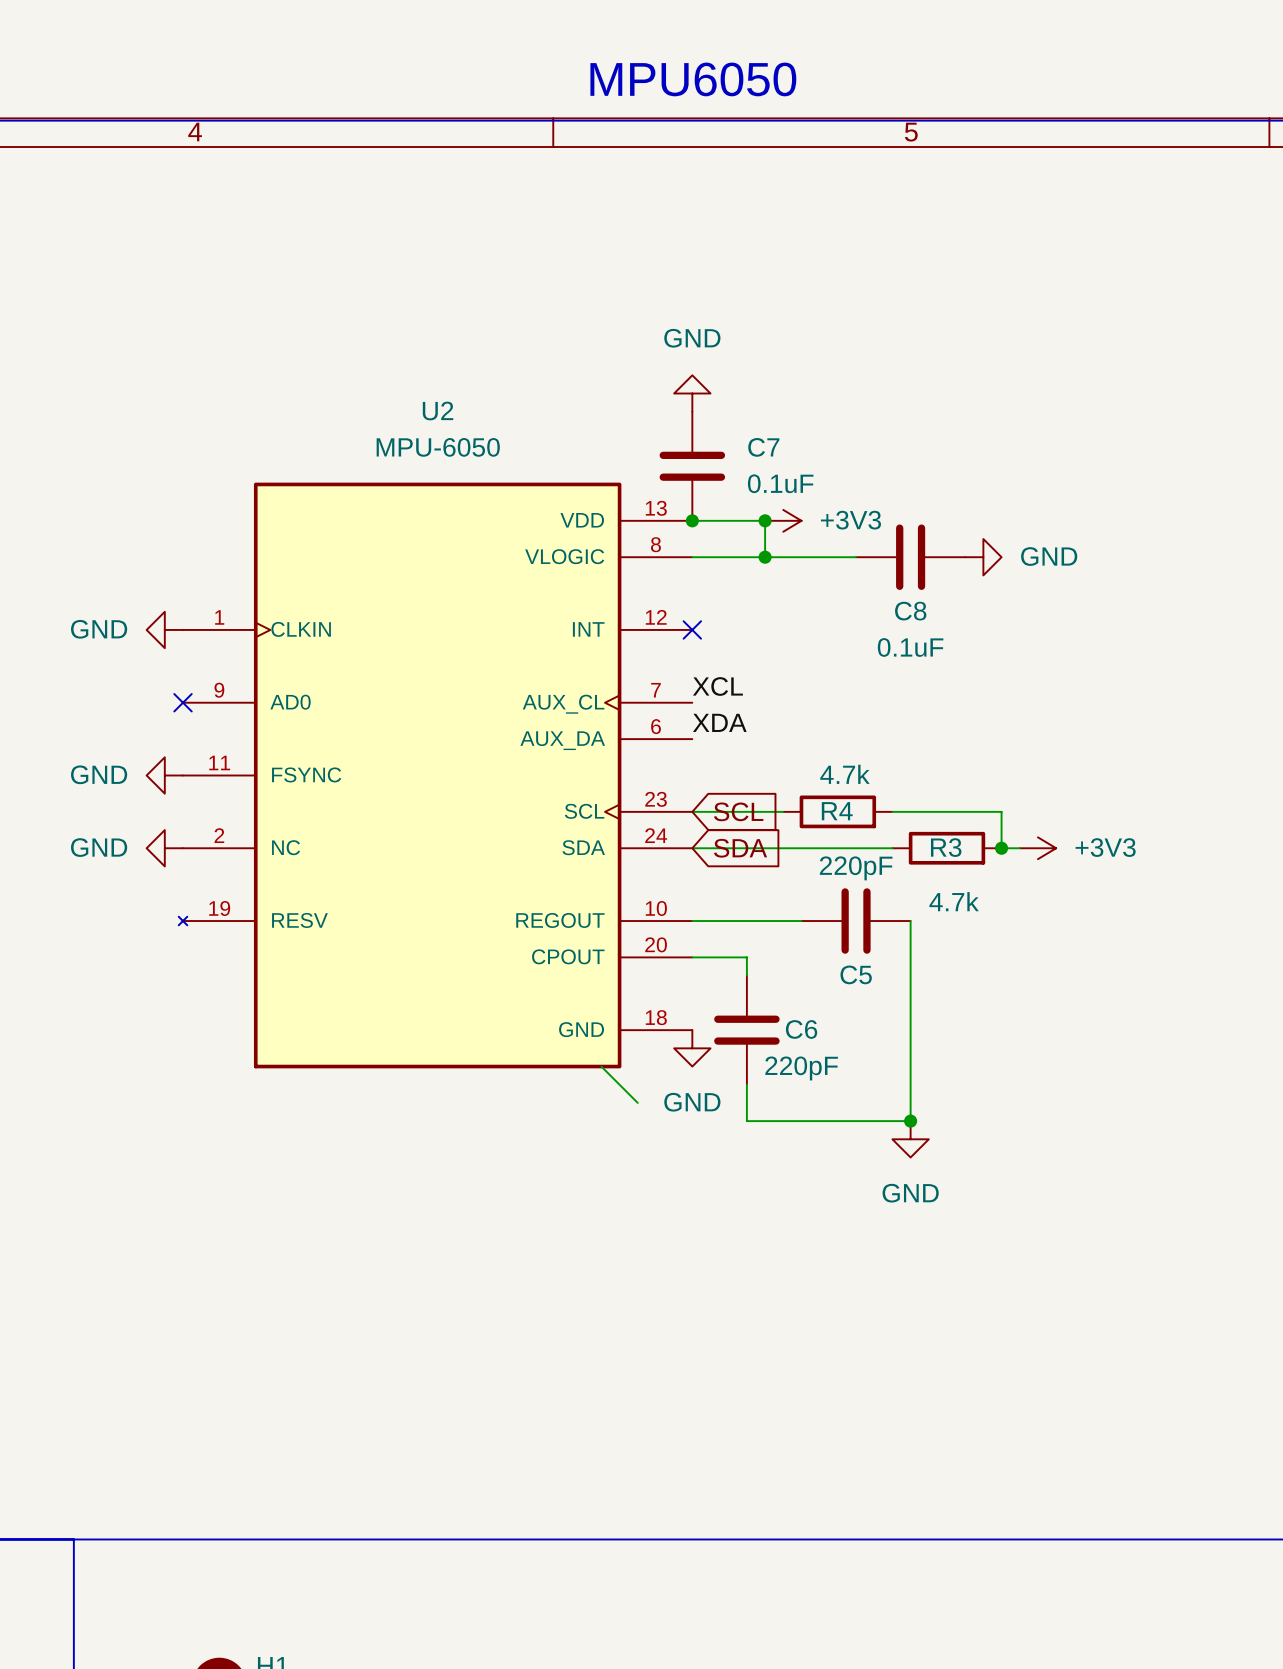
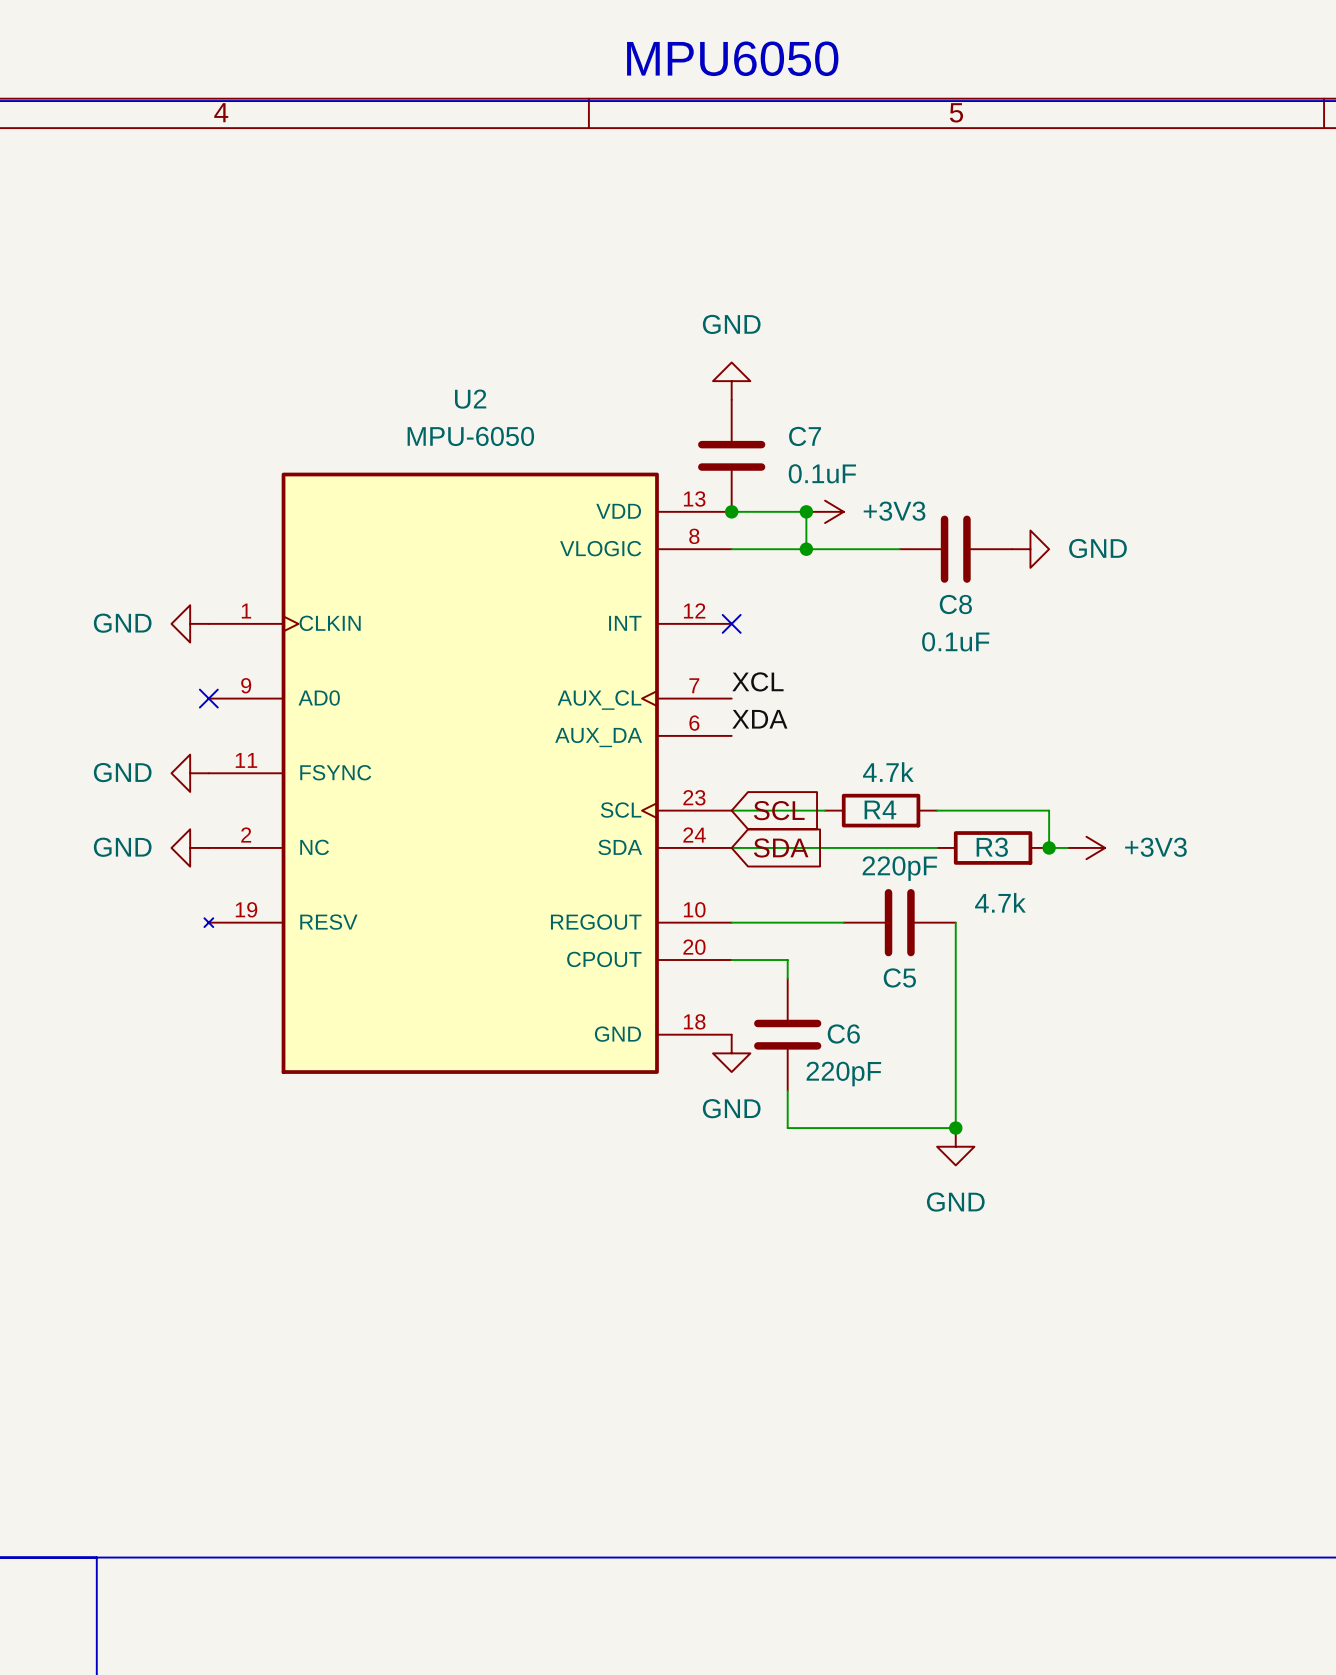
wire: (601, 1066) (637, 1102) -> none

